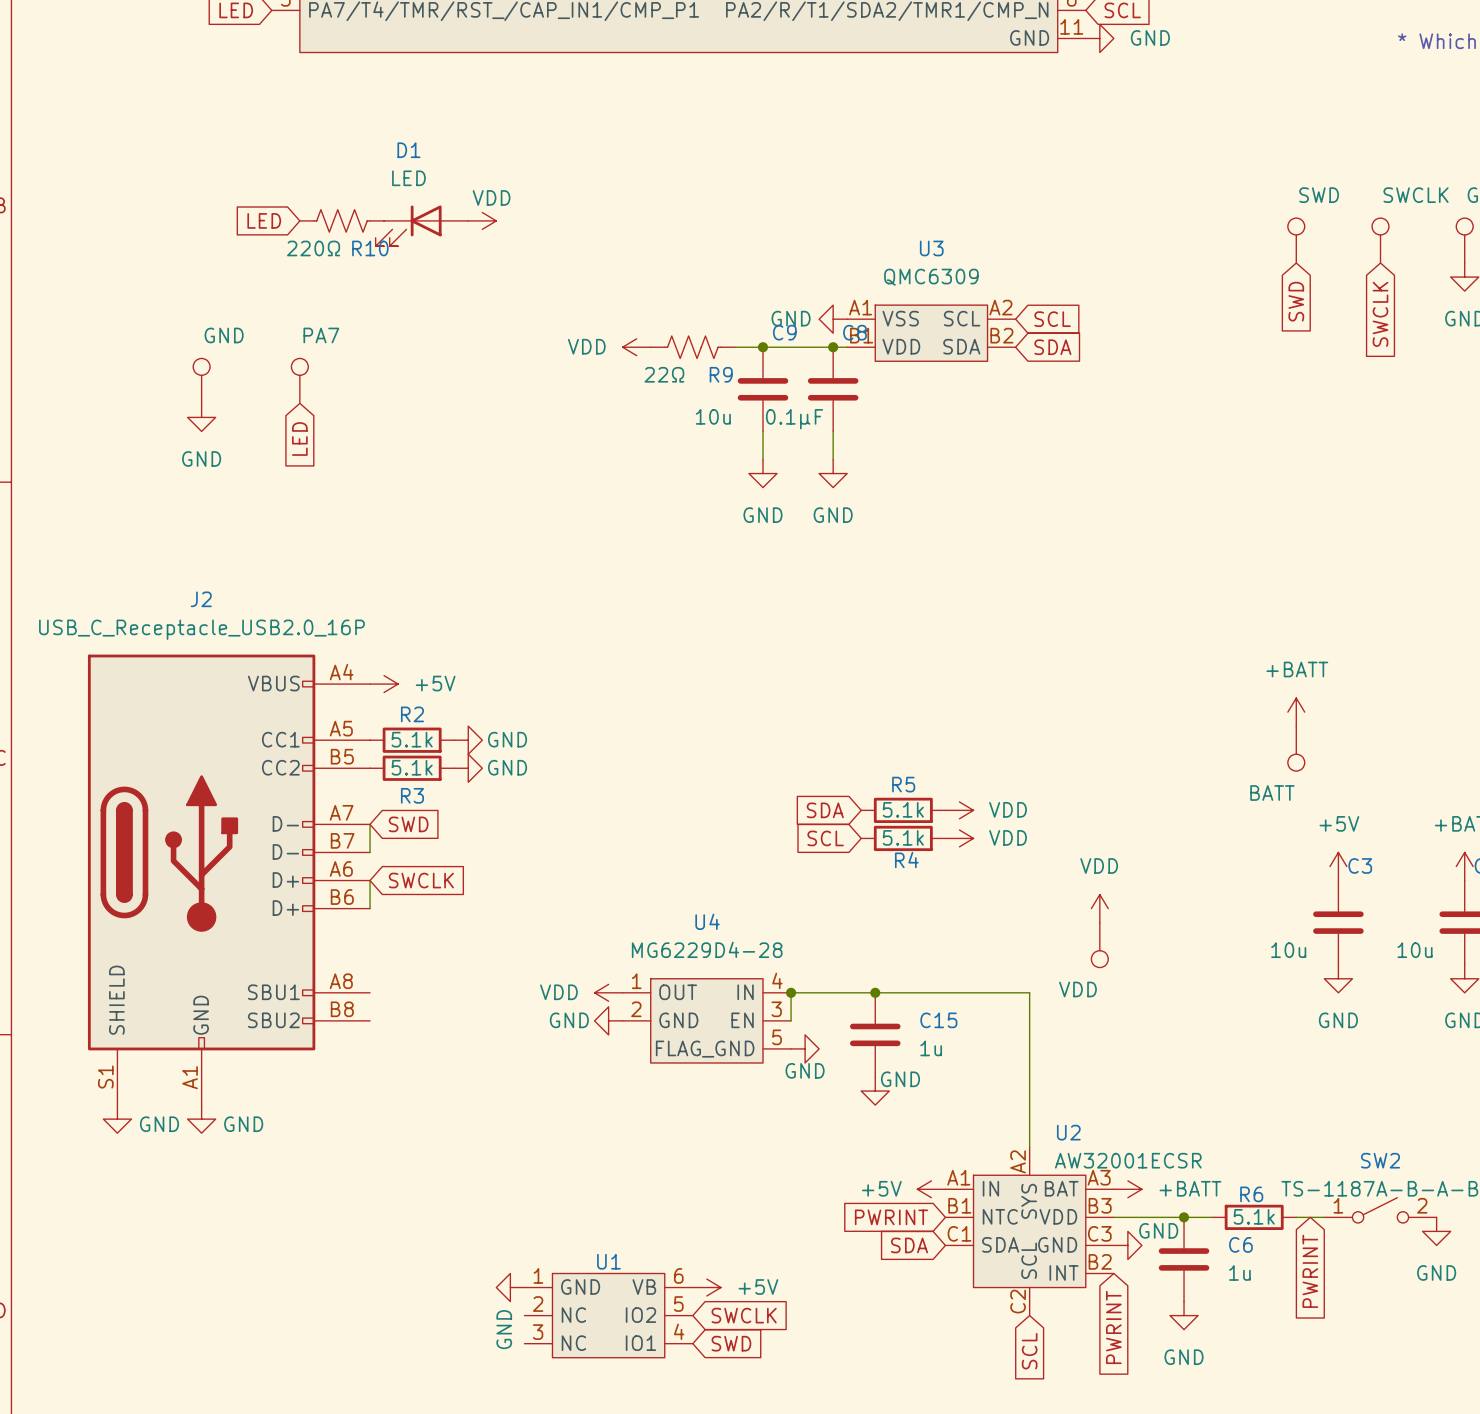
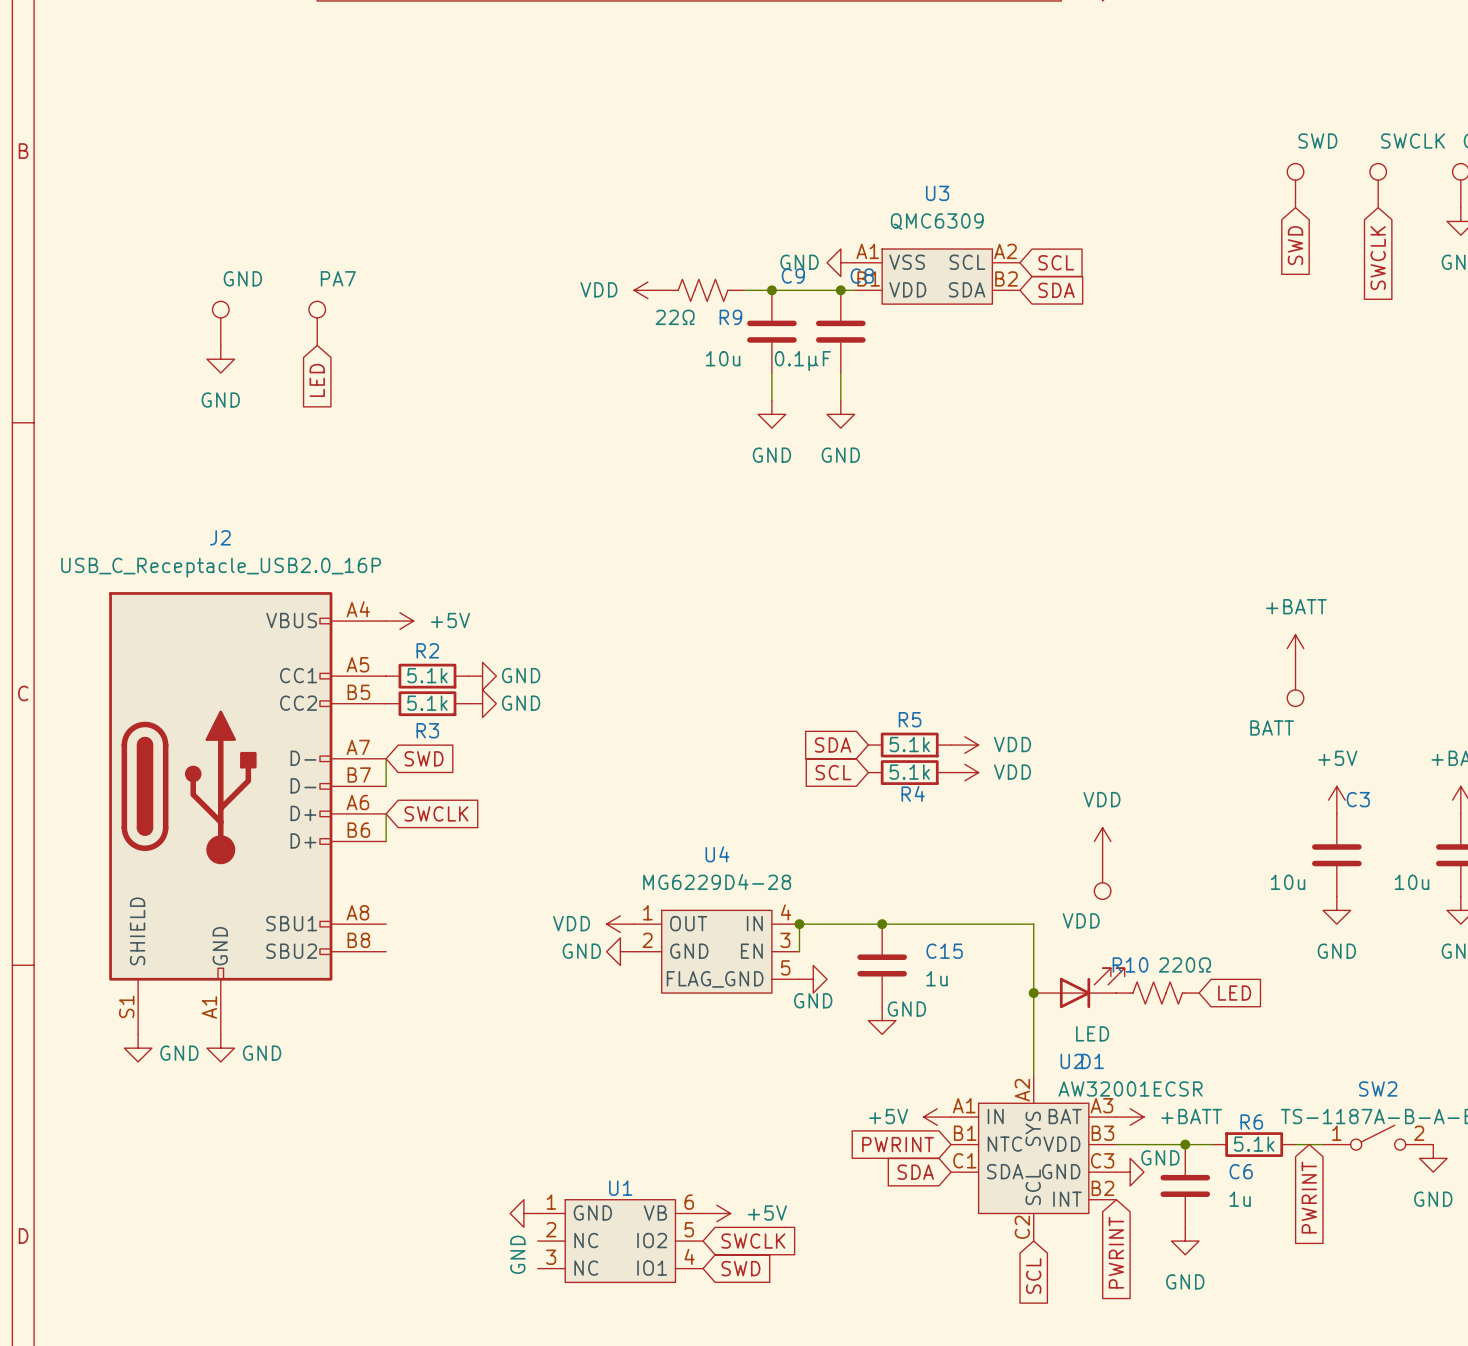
global label: LED (264, 220) -> none
R10 position: (341, 220) -> (1157, 993)
power symbol: VDD (482, 220) -> none
D1 rotation: 0° (408, 225) -> 180° (1092, 988)
D1 position: (421, 225) -> (1079, 988)
R10 value position: 220Ω (313, 248) -> 220Ω (1184, 964)
R10 name position: R10 (370, 248) -> R10 (1130, 964)
junction: none -> (1033, 993)
global label: none -> LED (1234, 993)

